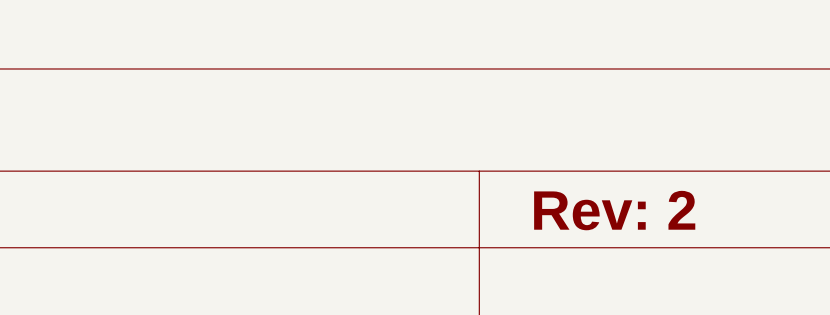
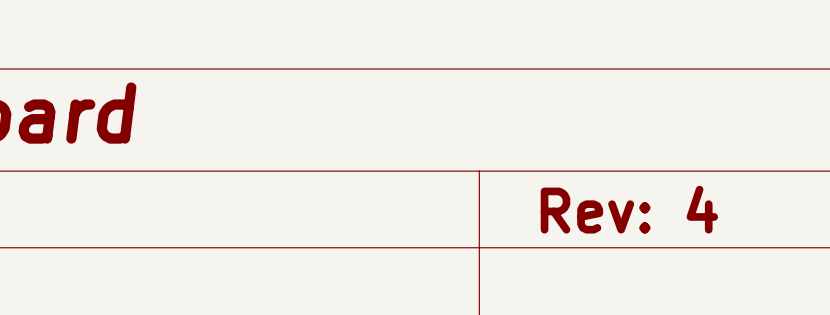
title block: Rev: 2 (614, 210) -> Rev: 4 (629, 209)

